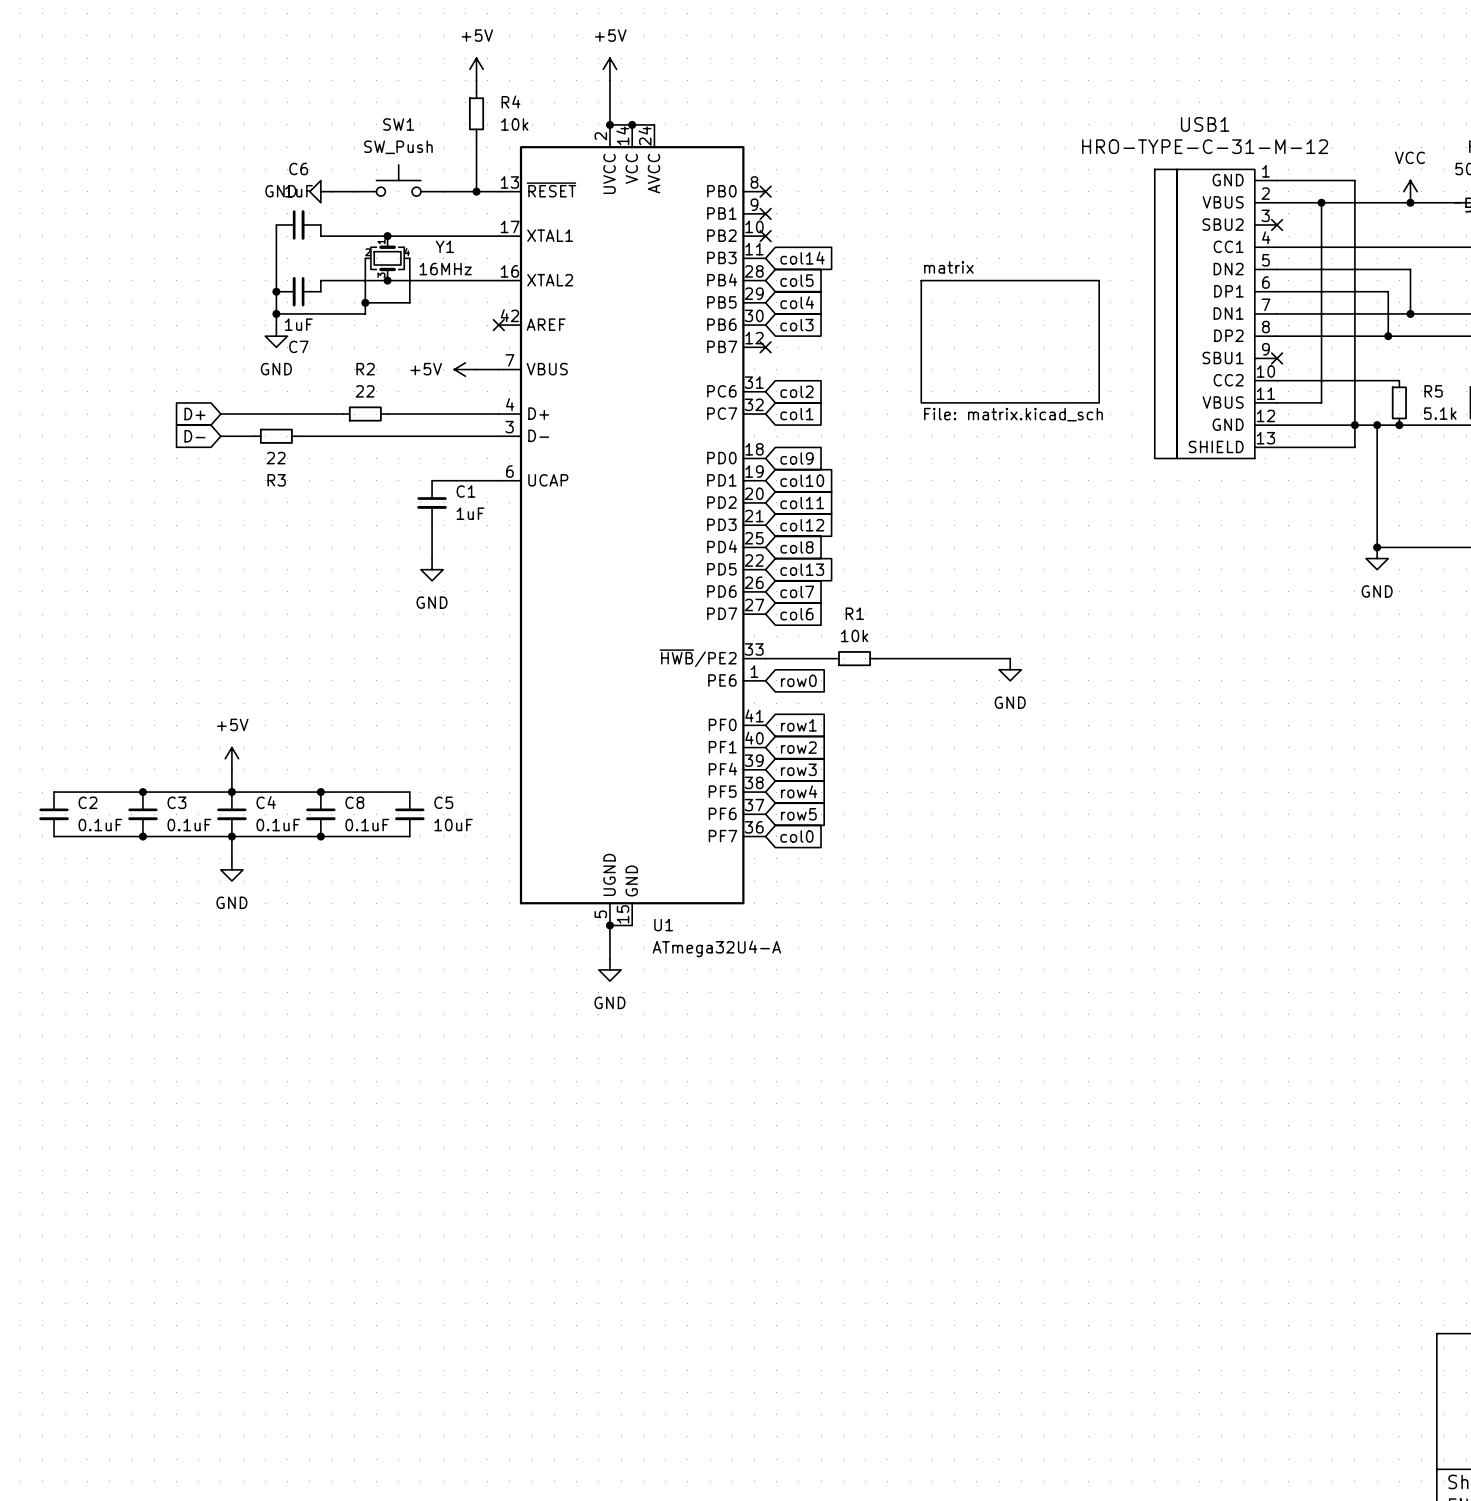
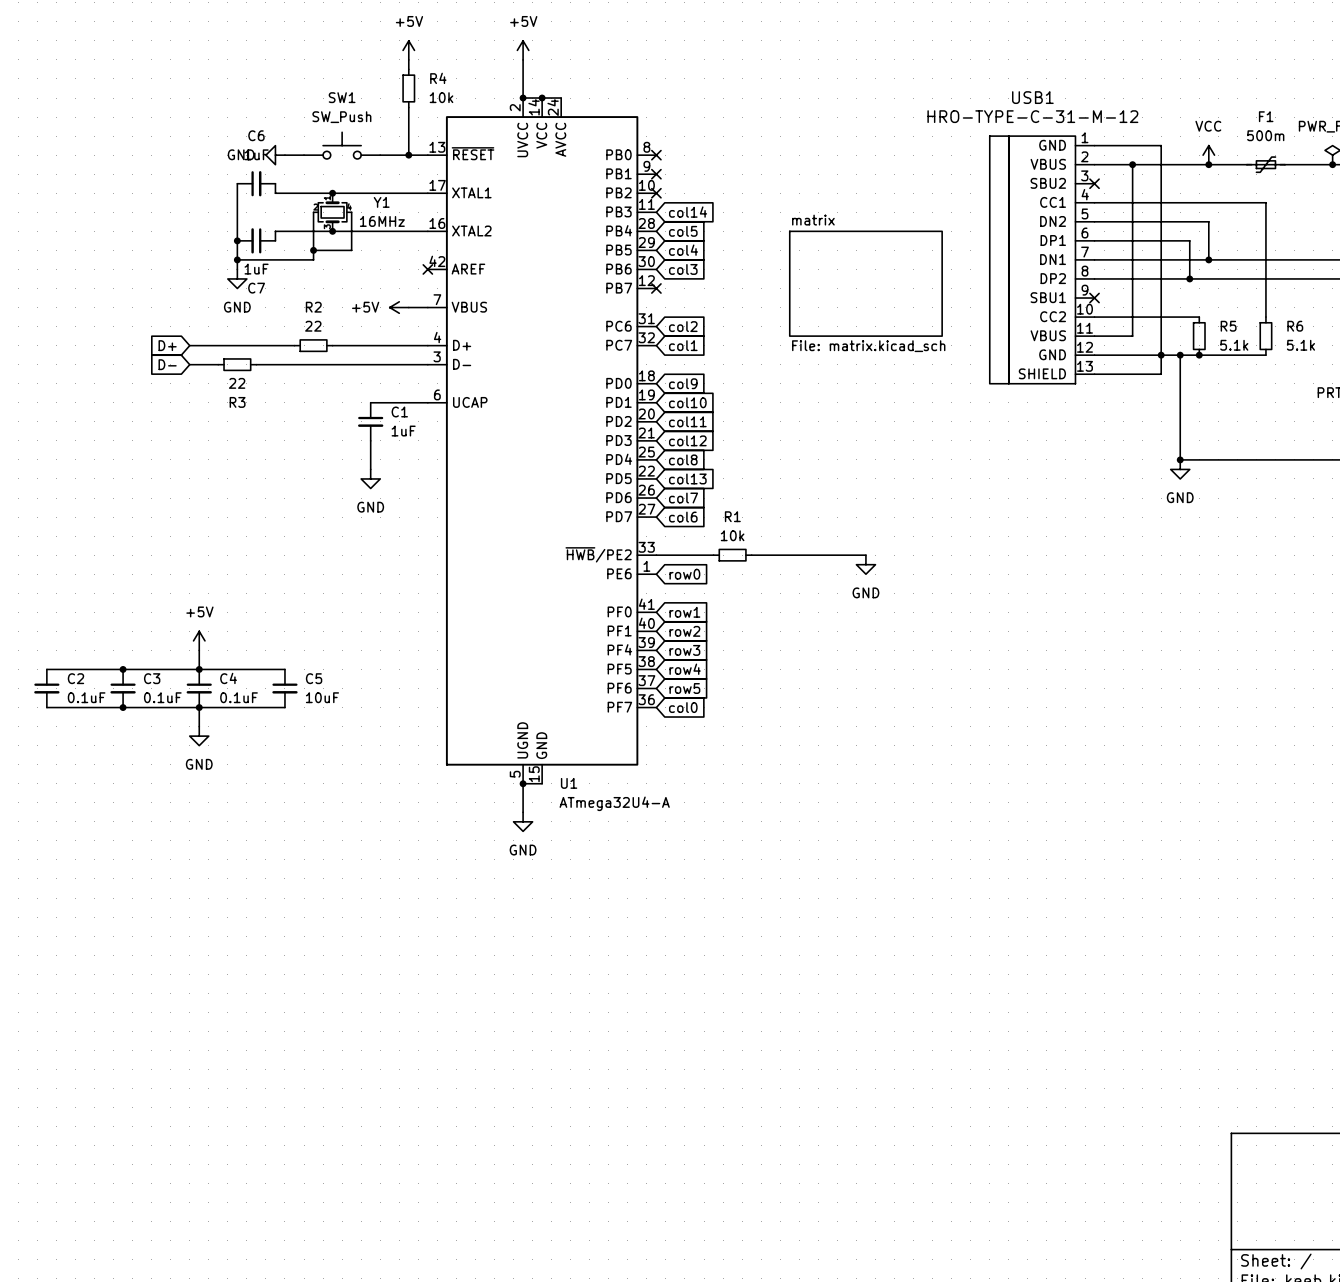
junction: (320, 792) -> none
wire: (331, 792) (409, 792) -> none
C8: 0.1uF (320, 814) -> none
C5 position: (409, 814) -> (284, 688)
junction: (320, 836) -> none
wire: (331, 836) (409, 836) -> none

